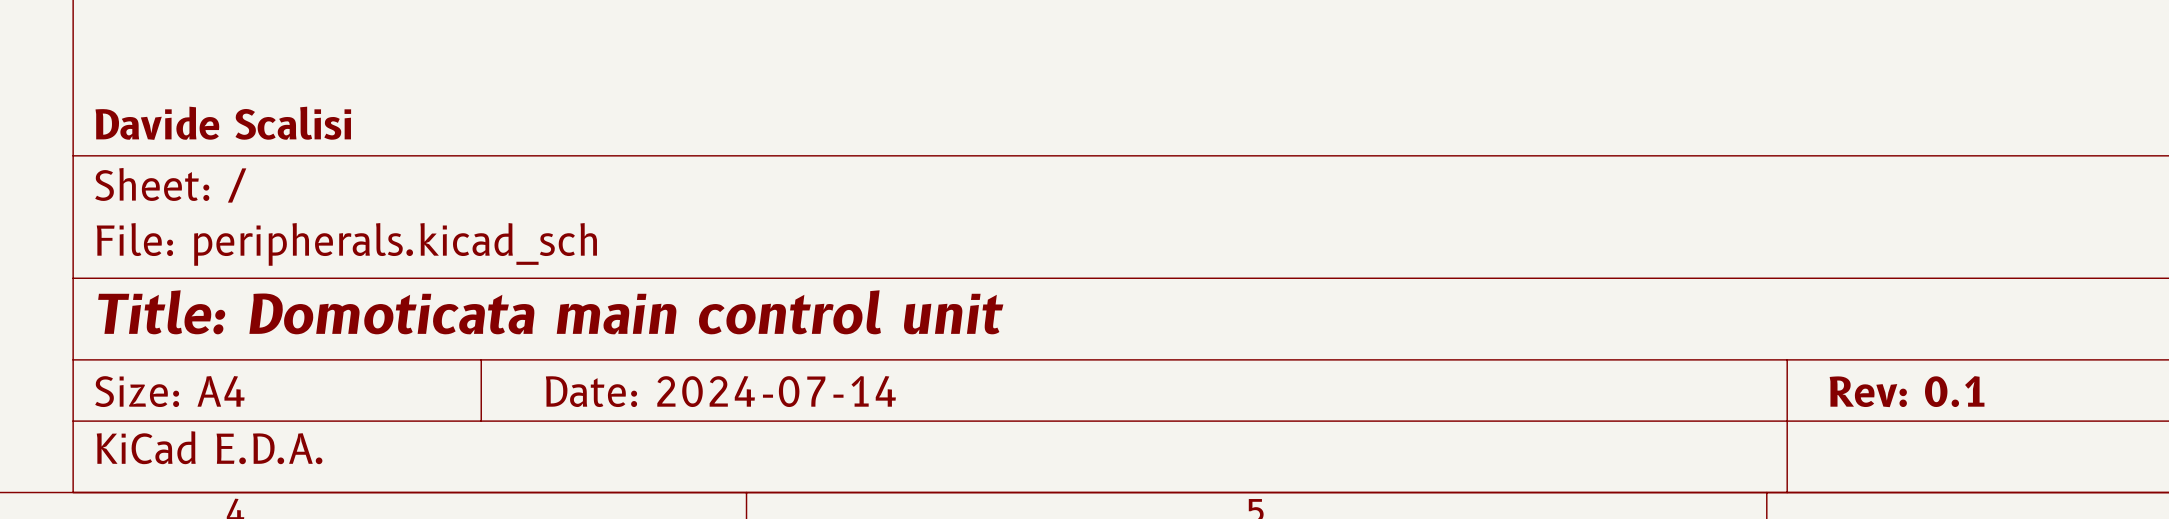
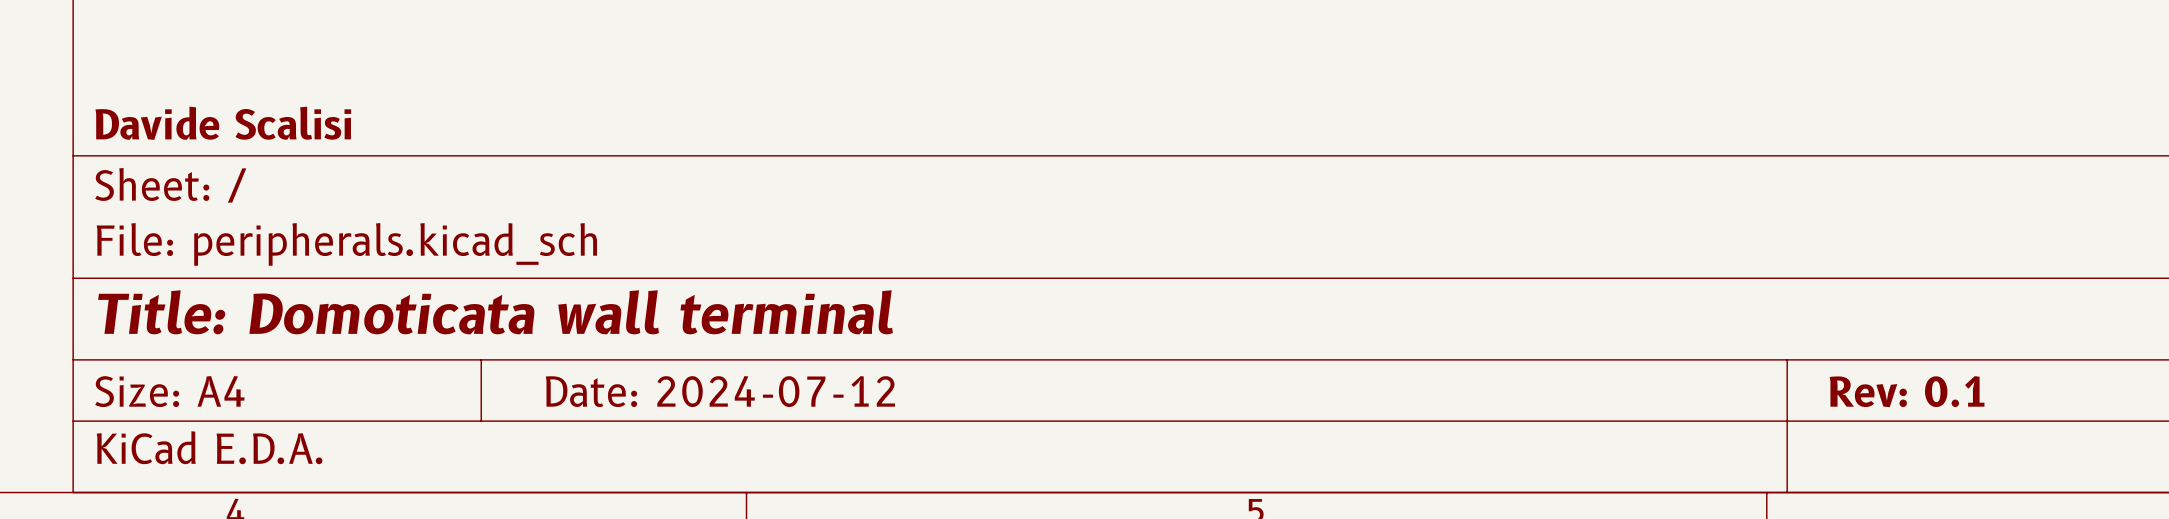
title block: Title: Domoticata main control unit (550, 312) -> Title: Domoticata wall terminal (495, 312)
title block: Date: 2024-07-14 (720, 391) -> Date: 2024-07-12 (720, 391)

